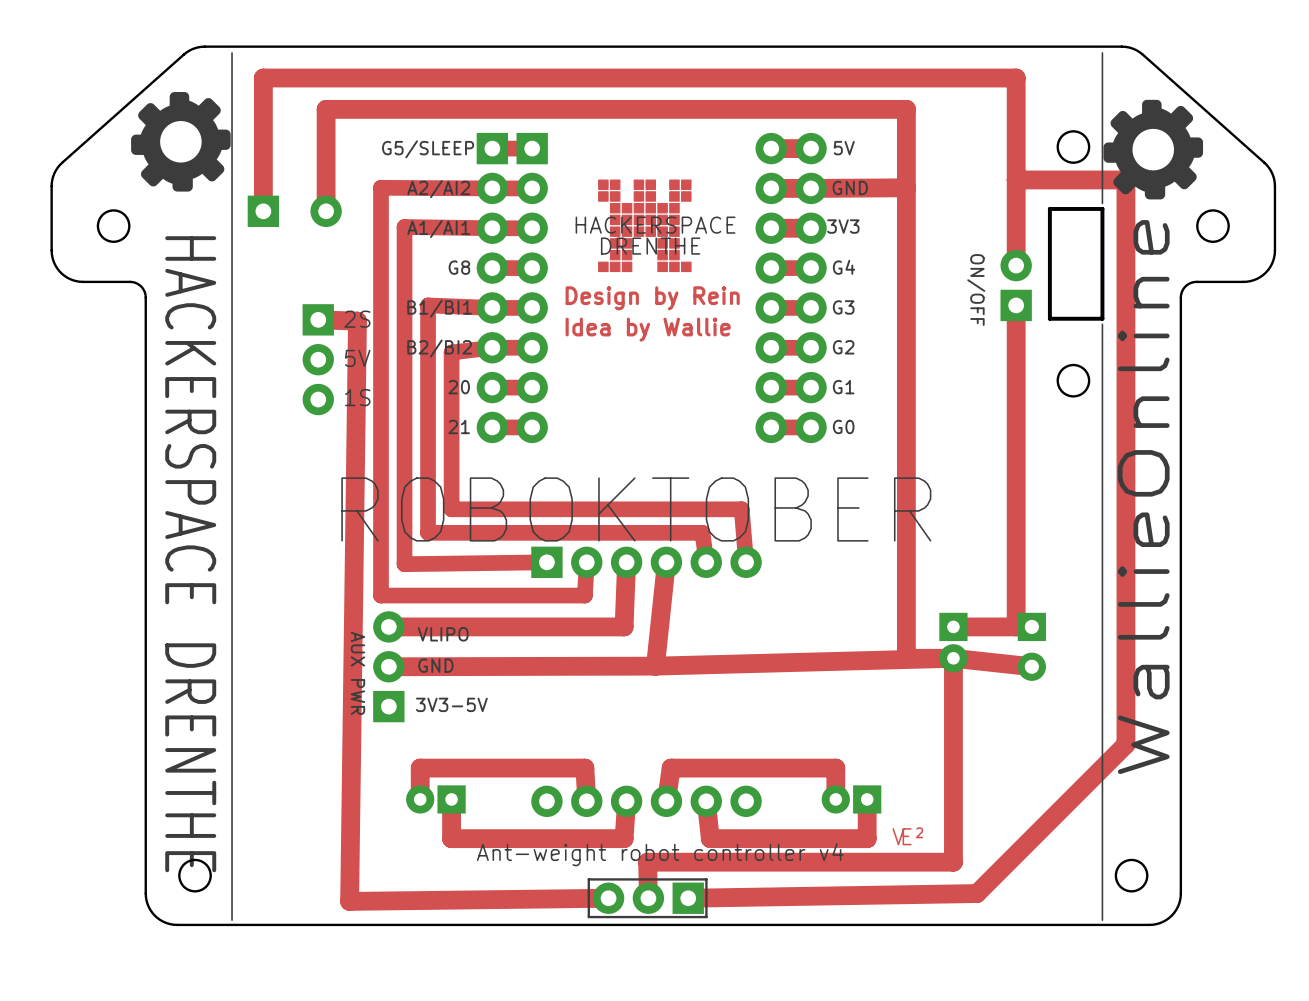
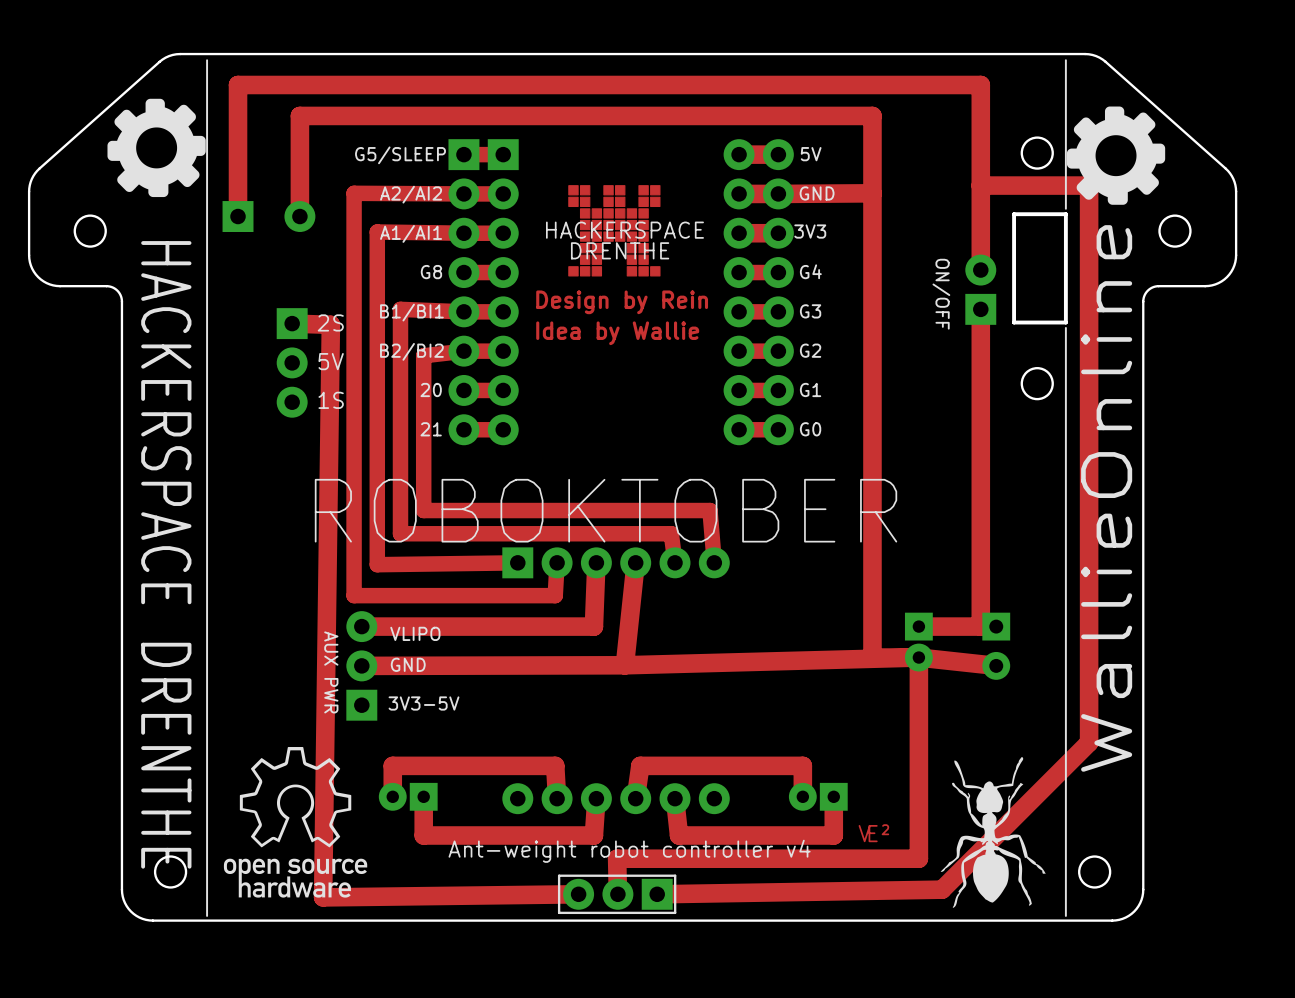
drawing: none -> [223, 747, 368, 898]
drawing: none -> [940, 757, 1046, 908]

